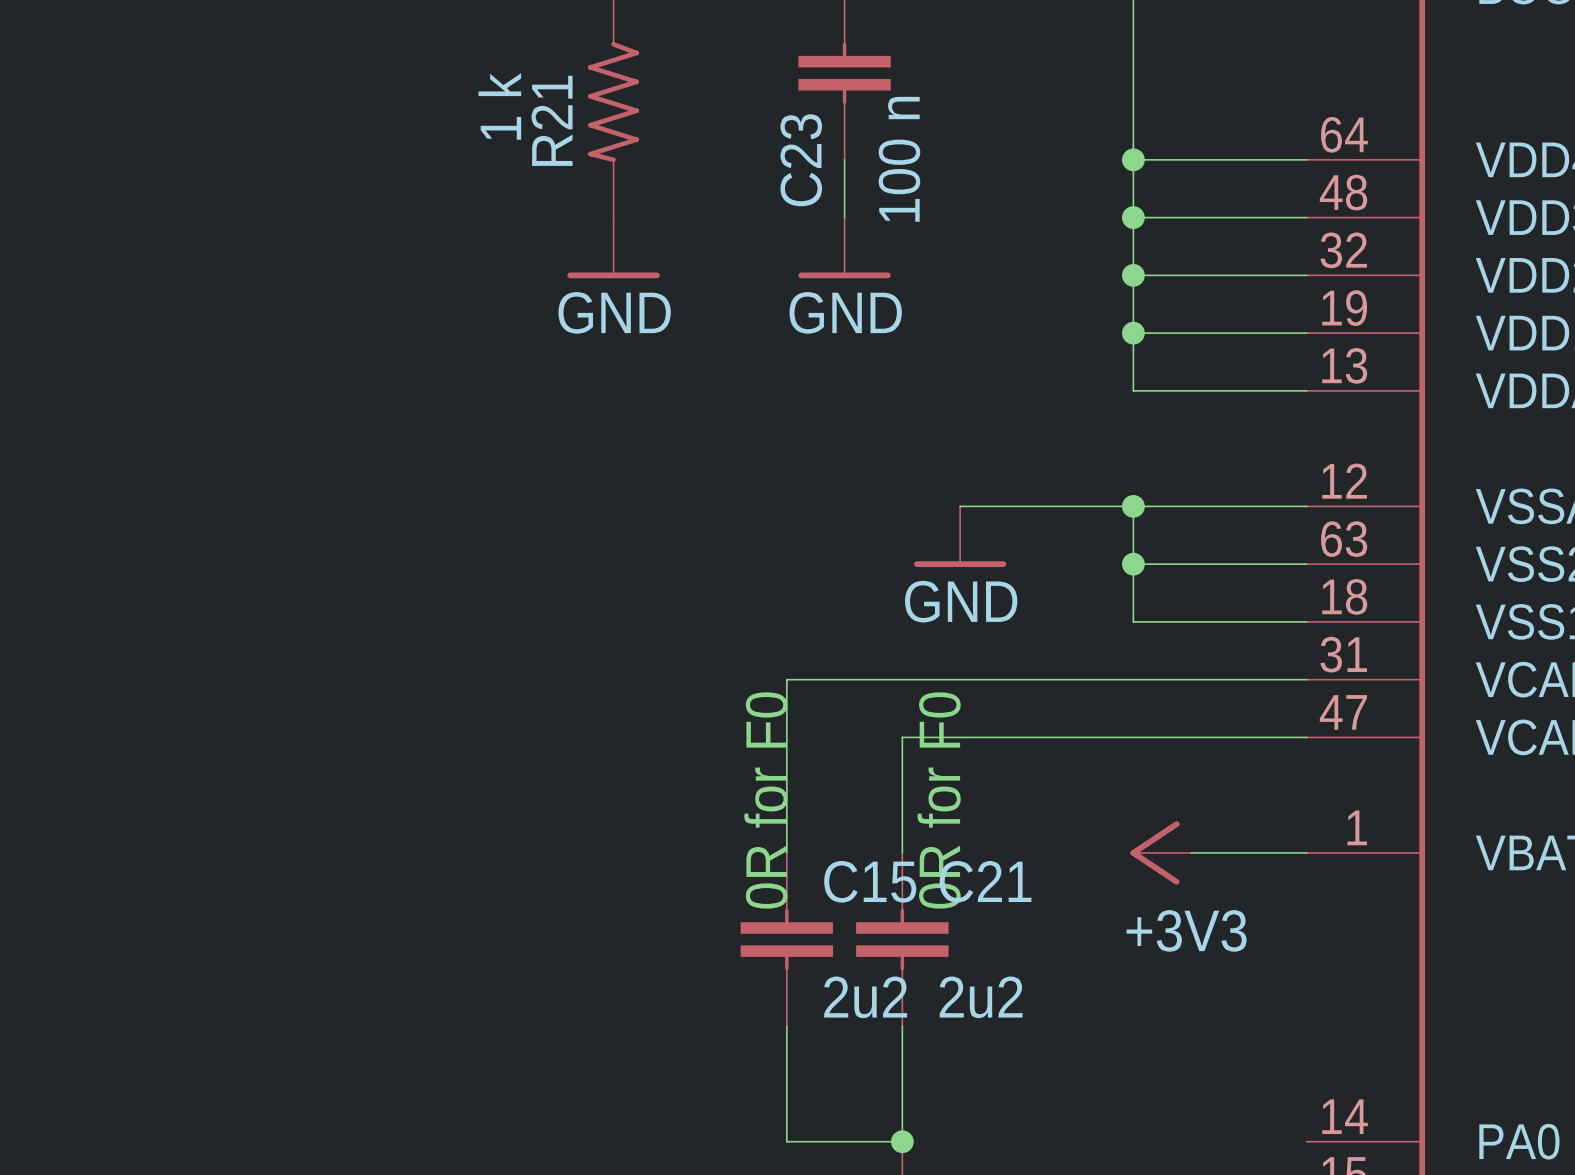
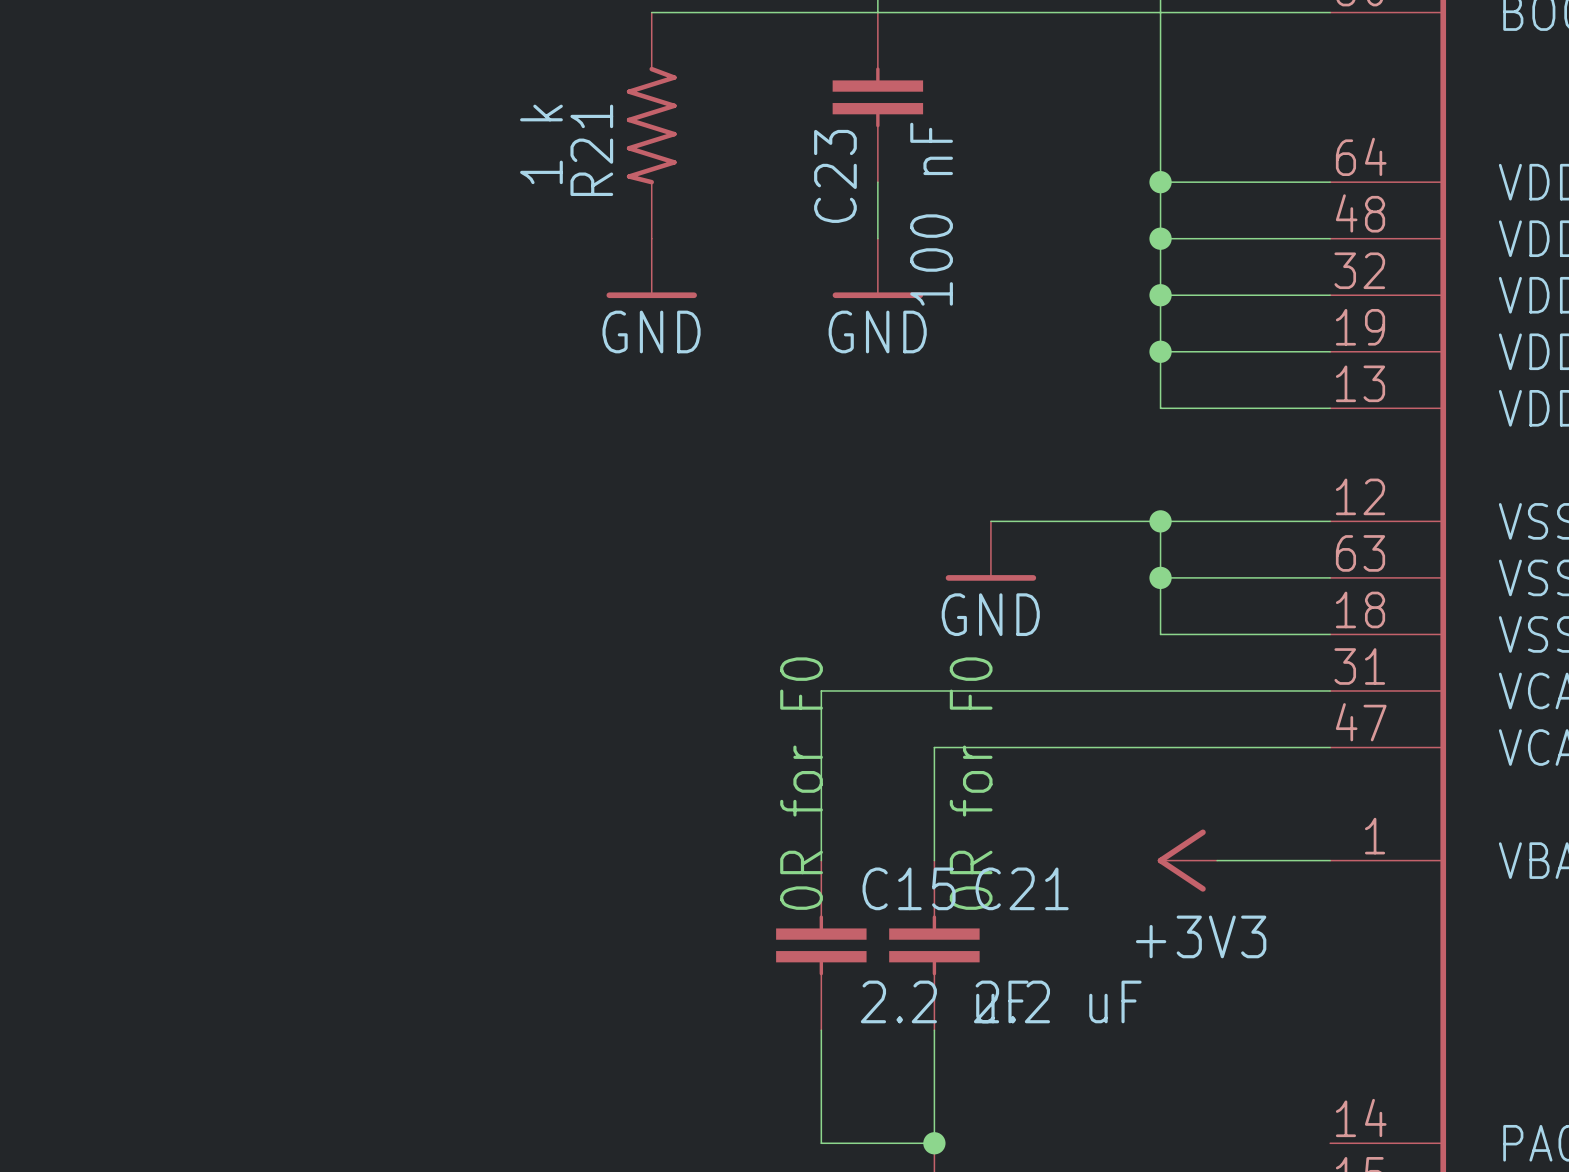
C23 value: 100 n (899, 159) -> 100 nF (931, 214)
C15 value: 2u2 (865, 997) -> 2.2 uF (944, 1001)
C21 value: 2u2 (981, 997) -> 2.2 uF (1057, 1001)

